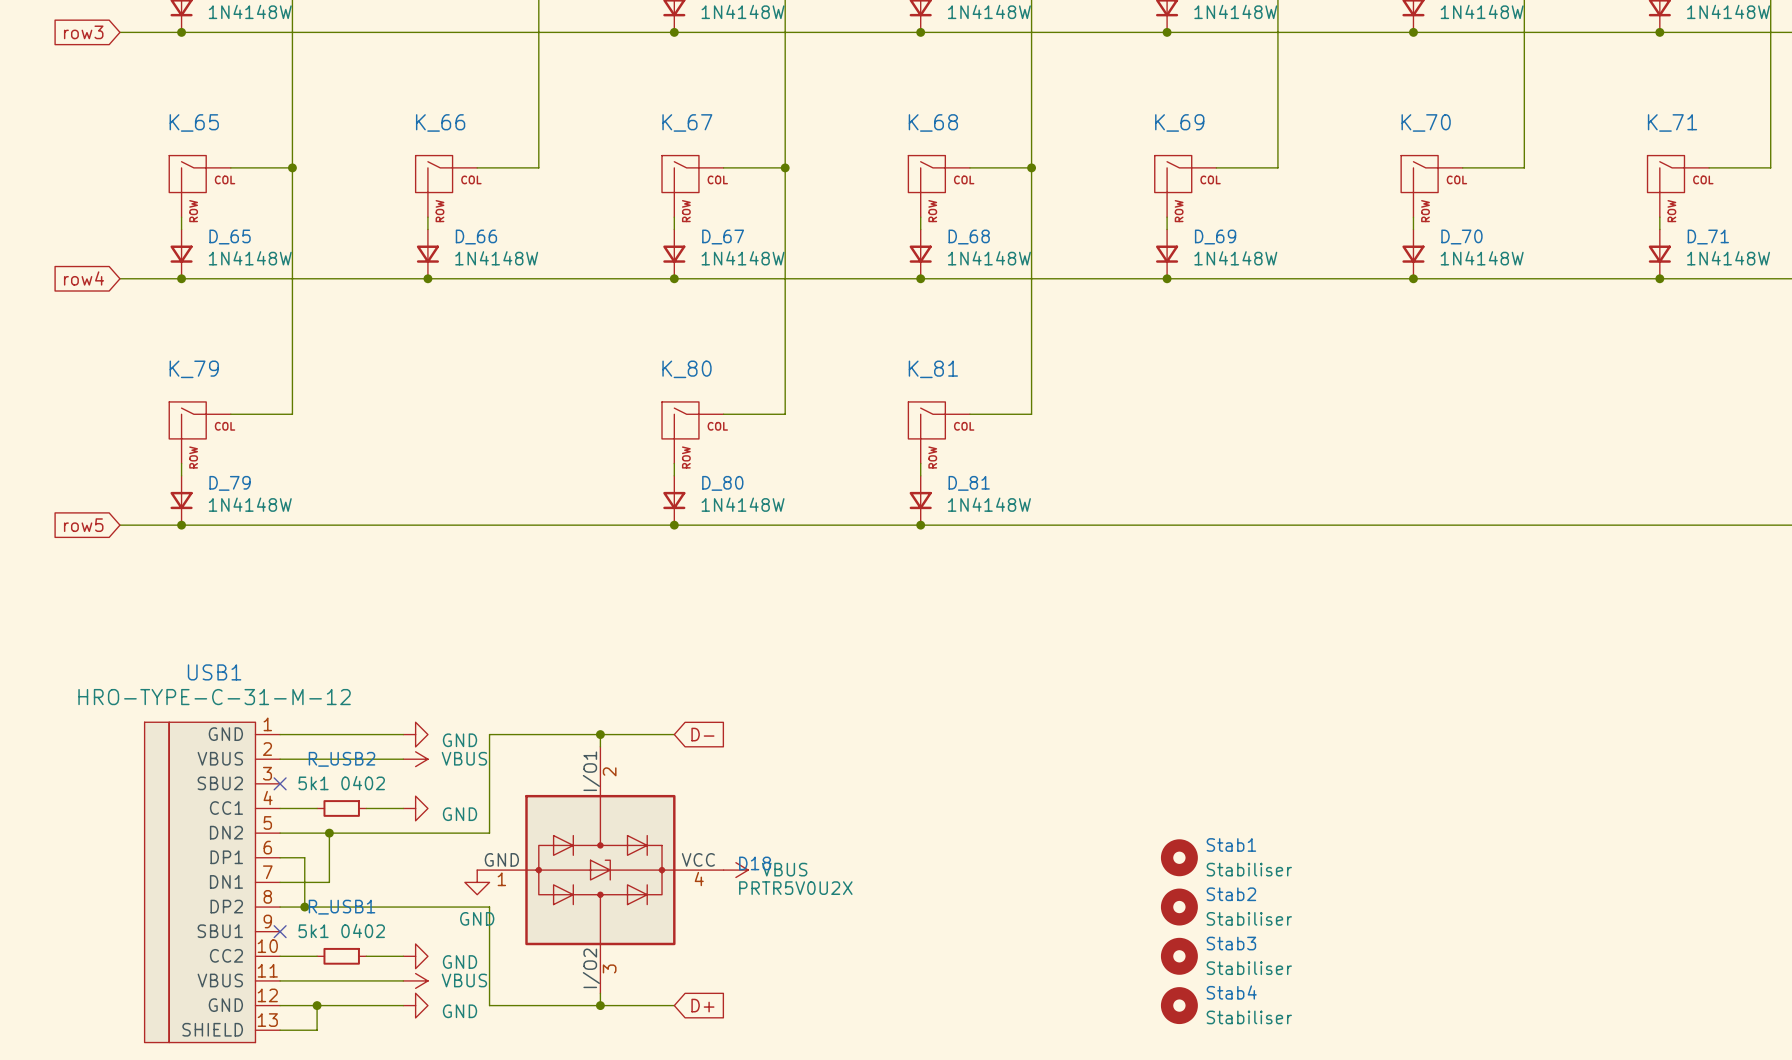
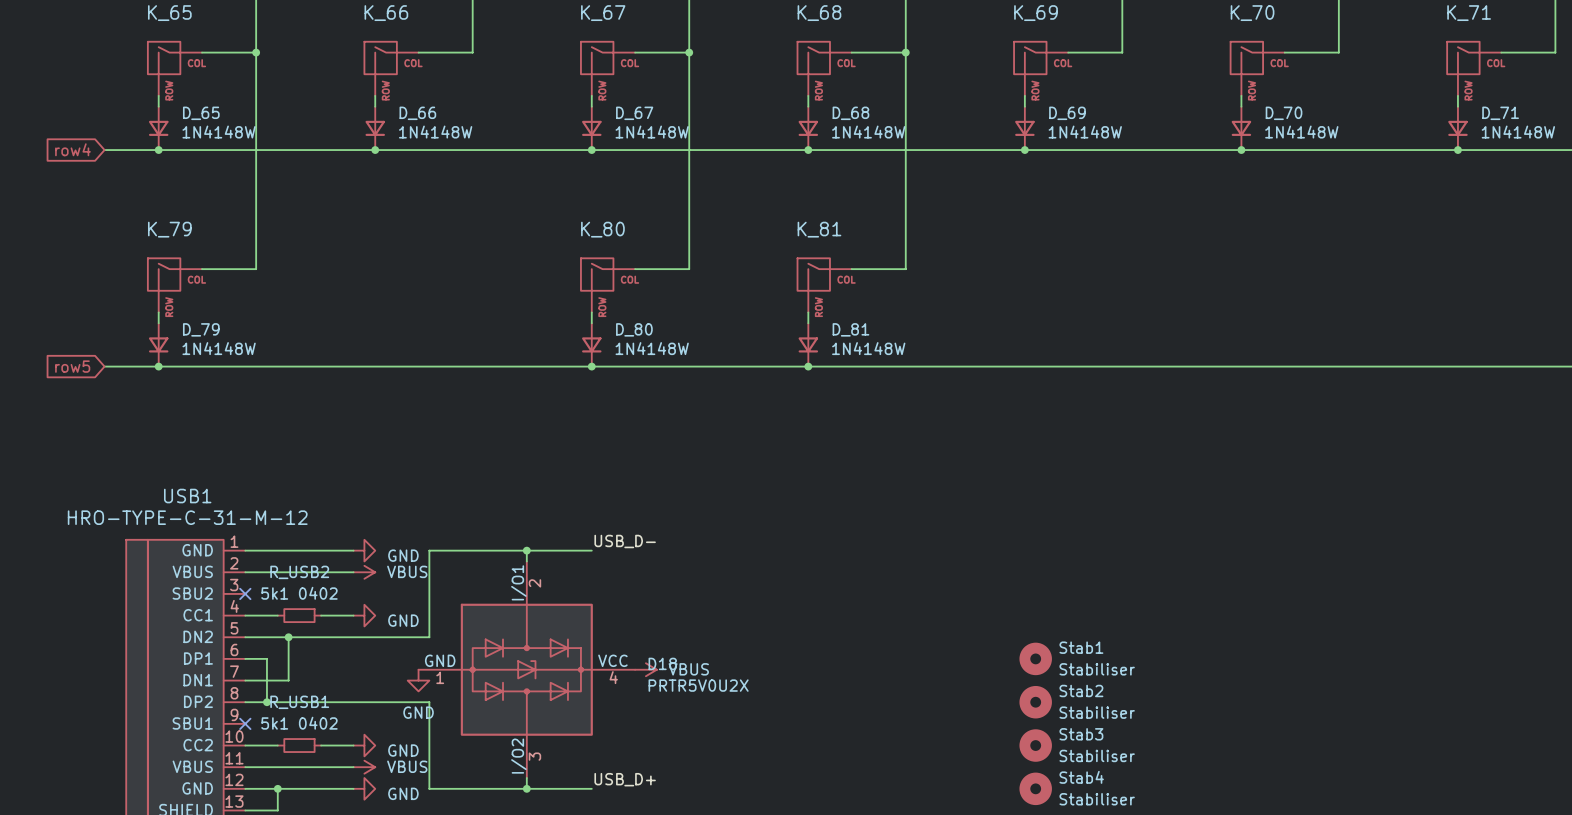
label: none -> USB_D- (625, 541)
global label: D- (702, 734) -> none
label: none -> USB_D+ (625, 779)
global label: D+ (702, 1005) -> none

